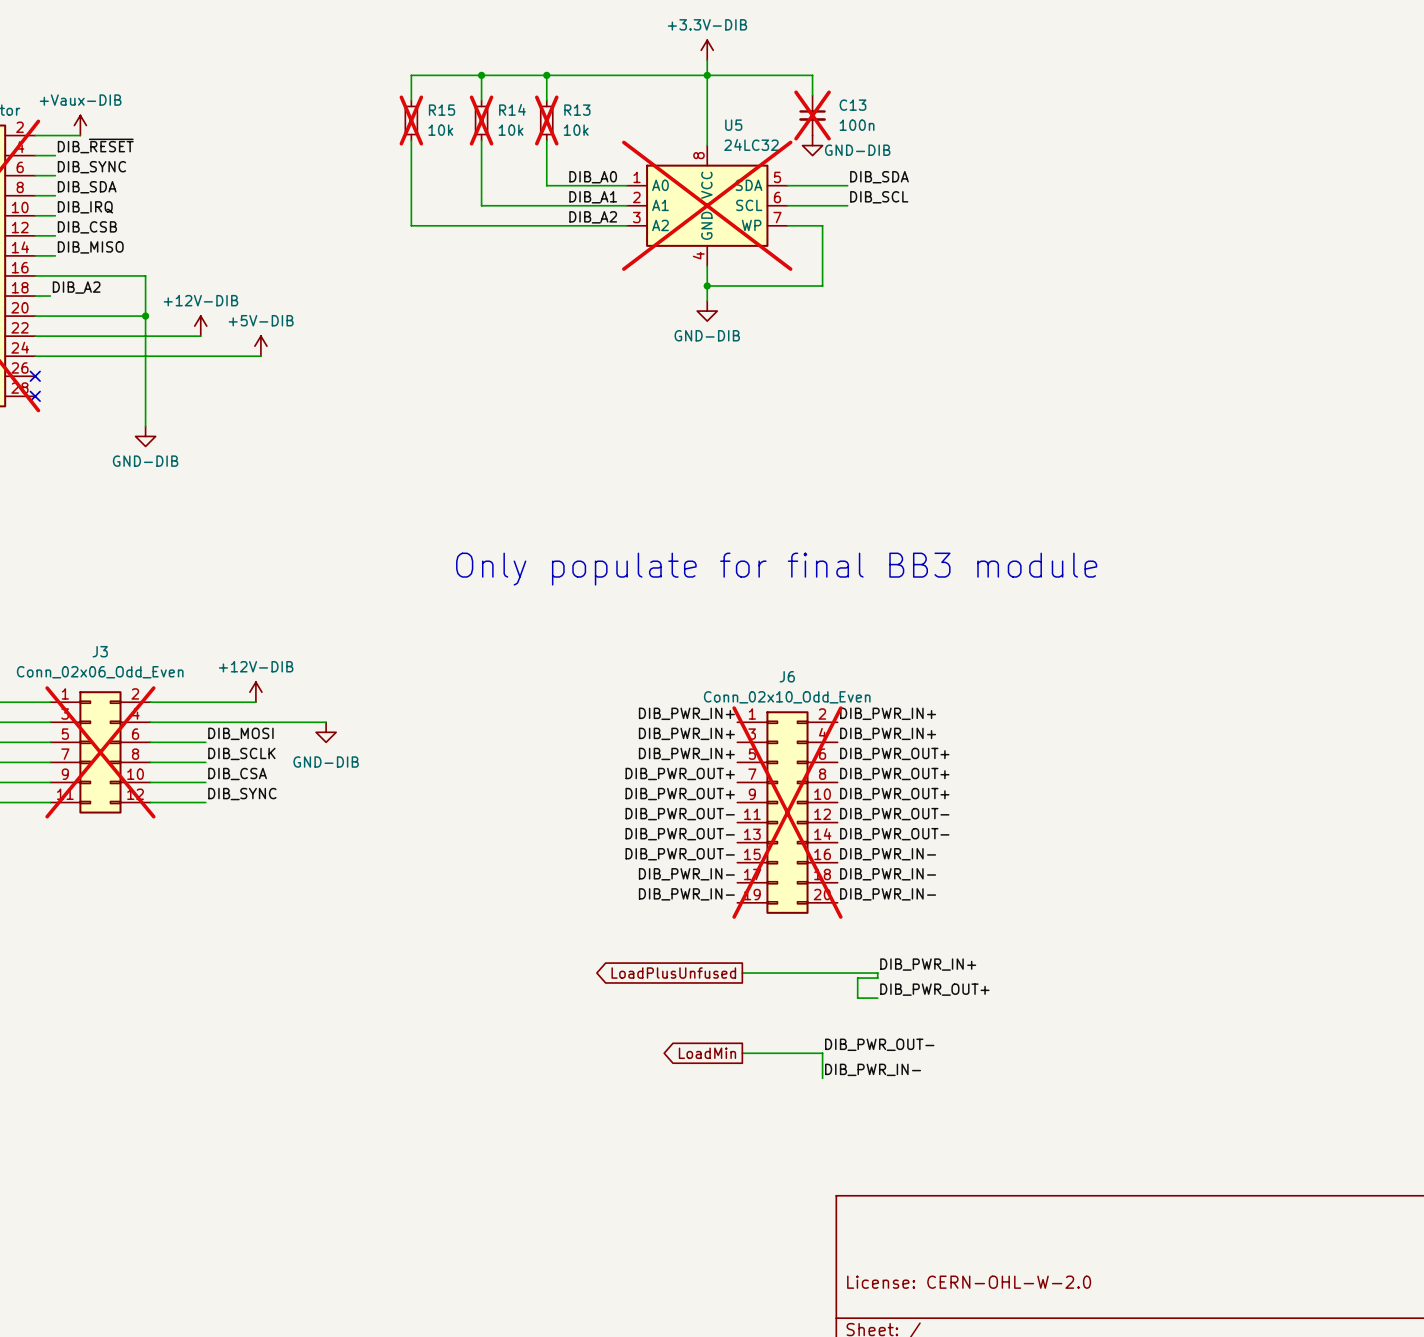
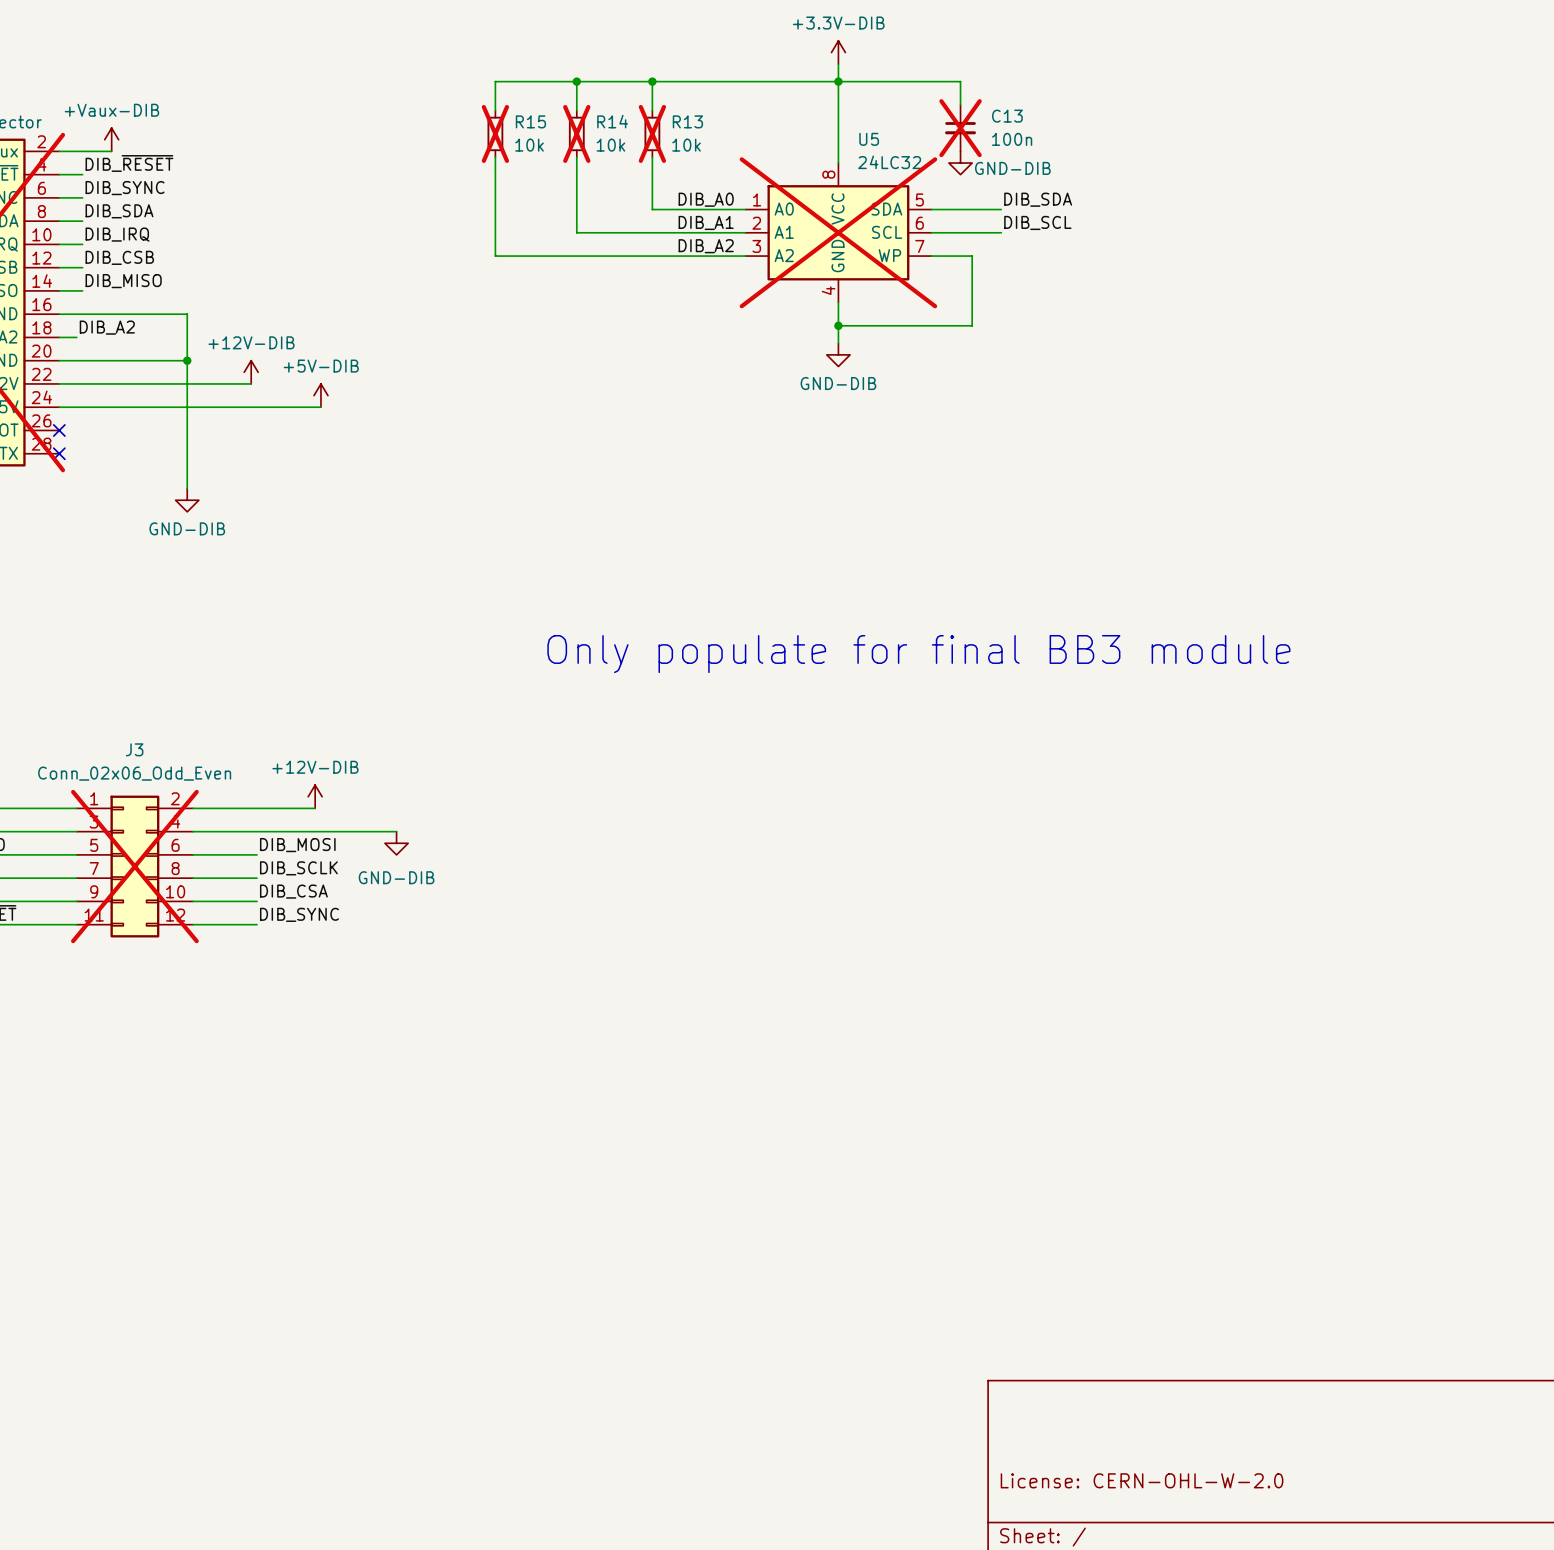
label: DIB_PWR_IN+ (686, 713) -> none
label: DIB_PWR_IN+ (888, 713) -> none
label: DIB_PWR_IN+ (686, 733) -> none
label: DIB_PWR_IN+ (888, 733) -> none
label: DIB_PWR_IN+ (686, 753) -> none
label: DIB_PWR_OUT+ (894, 753) -> none
label: DIB_PWR_OUT+ (680, 773) -> none
label: DIB_PWR_OUT+ (894, 773) -> none
label: DIB_PWR_OUT+ (680, 794) -> none
label: DIB_PWR_OUT+ (894, 794) -> none
J6: Conn_02x10_Odd_Even (787, 812) -> none
label: DIB_PWR_OUT- (680, 814) -> none
label: DIB_PWR_OUT- (894, 814) -> none
label: DIB_PWR_OUT- (680, 834) -> none
label: DIB_PWR_OUT- (894, 834) -> none
label: DIB_PWR_OUT- (680, 854) -> none
label: DIB_PWR_IN- (888, 854) -> none
label: DIB_PWR_IN- (686, 874) -> none
label: DIB_PWR_IN- (888, 874) -> none
label: DIB_PWR_IN- (686, 894) -> none
label: DIB_PWR_IN- (888, 894) -> none
label: DIB_PWR_IN+ (928, 964) -> none
global label: LoadPlusUnfused (673, 973) -> none
wire: (742, 973) (877, 973) (877, 978) (857, 978) (857, 998) (877, 998) -> none
label: DIB_PWR_OUT+ (934, 989) -> none
label: DIB_PWR_OUT- (879, 1044) -> none
global label: LoadMin (707, 1053) -> none
wire: (742, 1053) (822, 1053) (822, 1078) -> none
label: DIB_PWR_IN- (873, 1069) -> none

